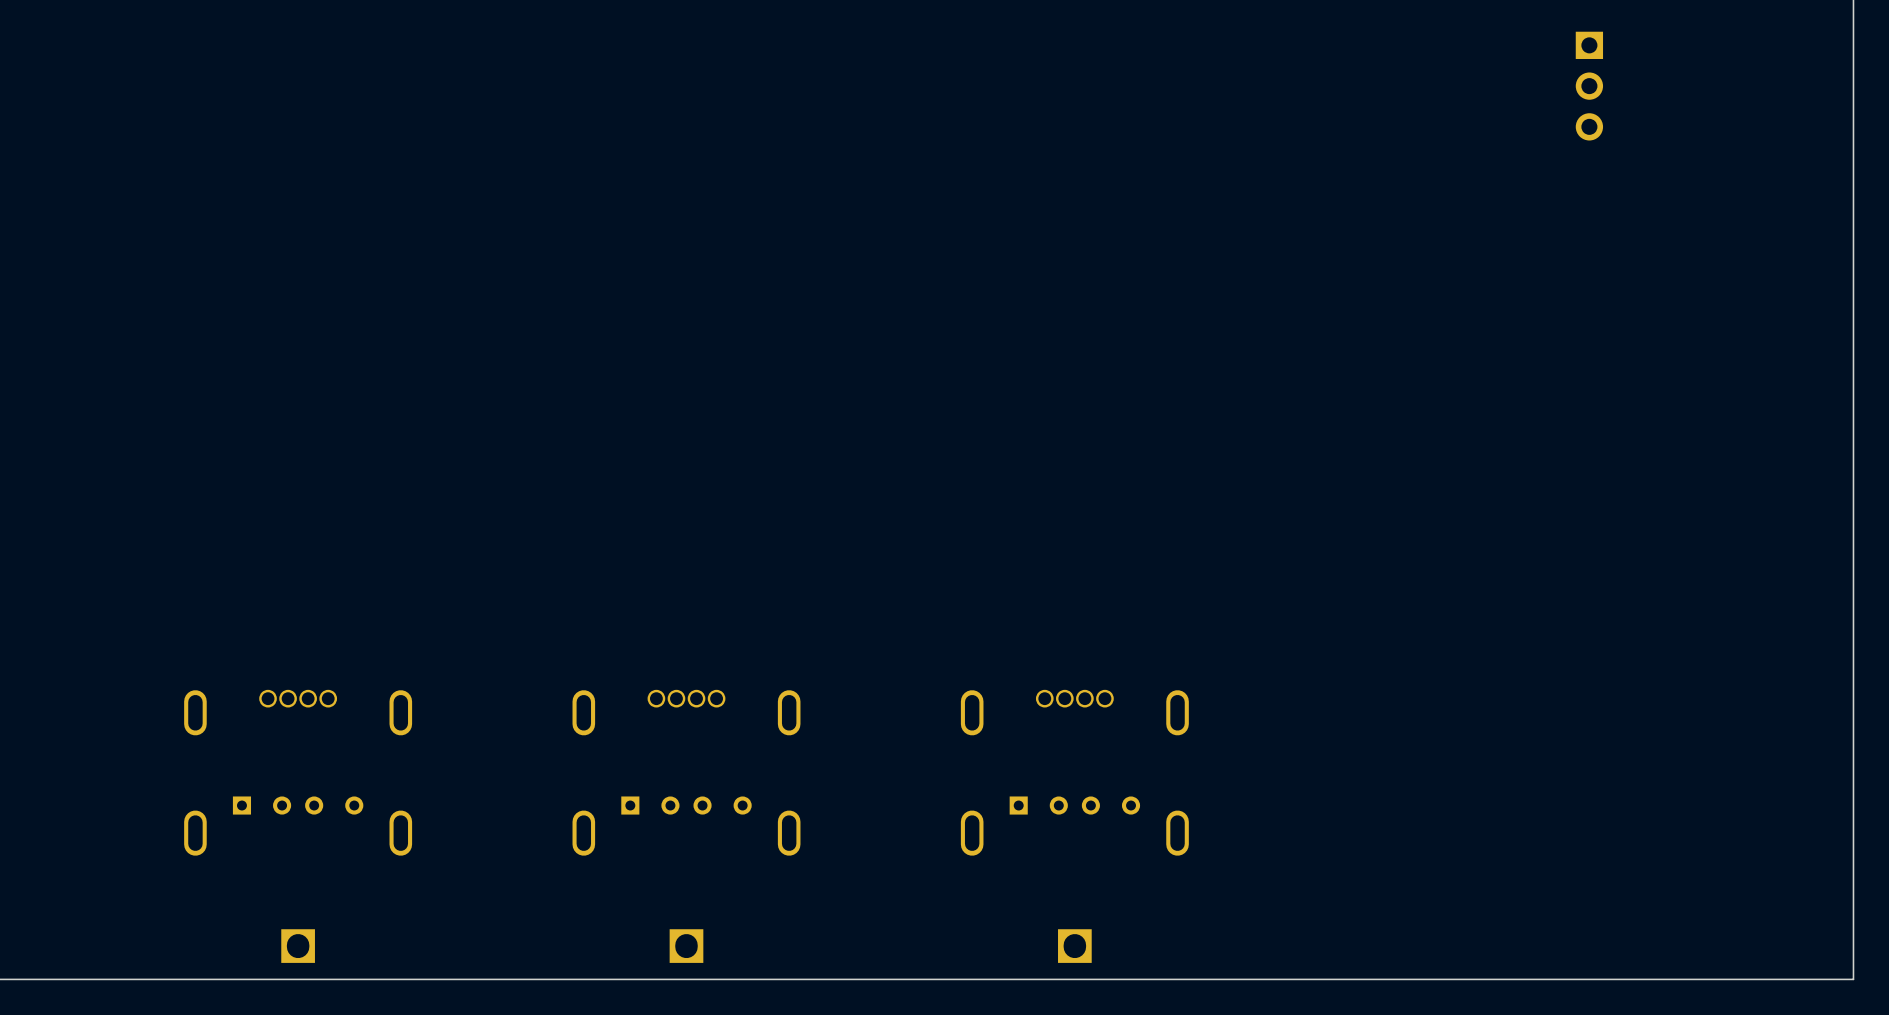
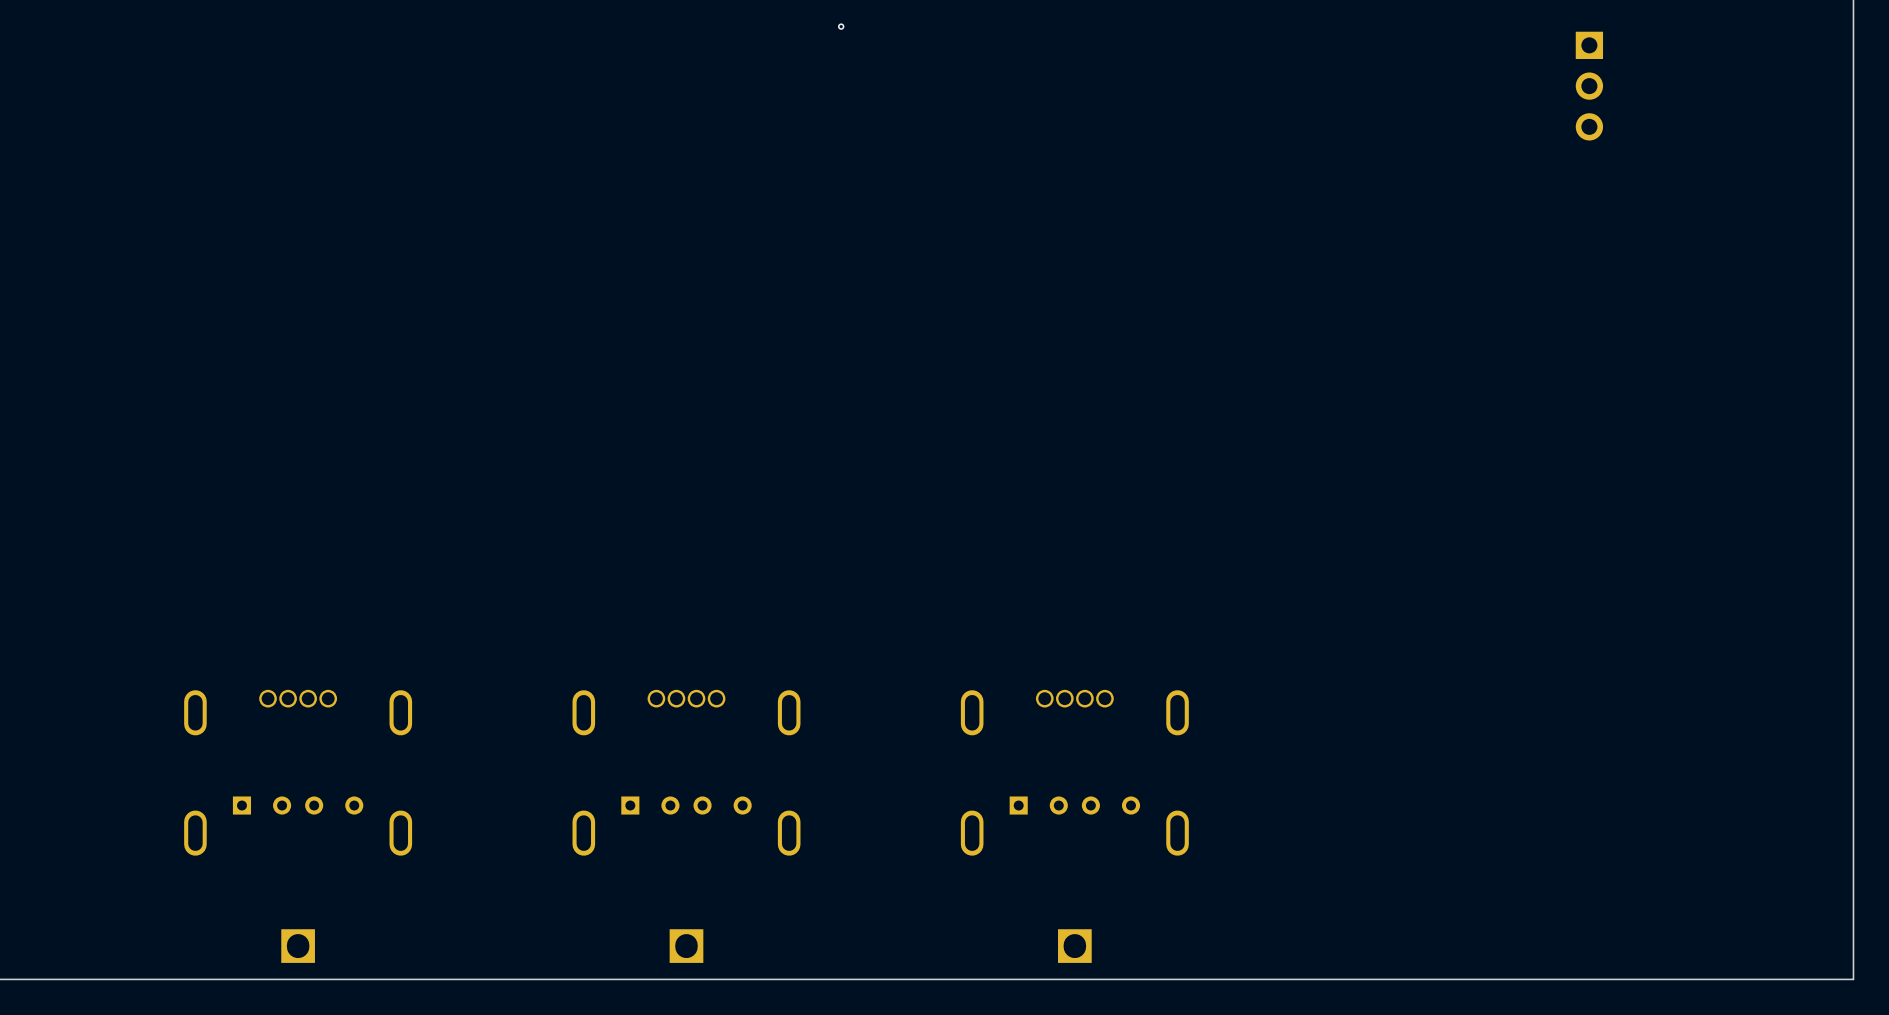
via: none -> (841, 26)

